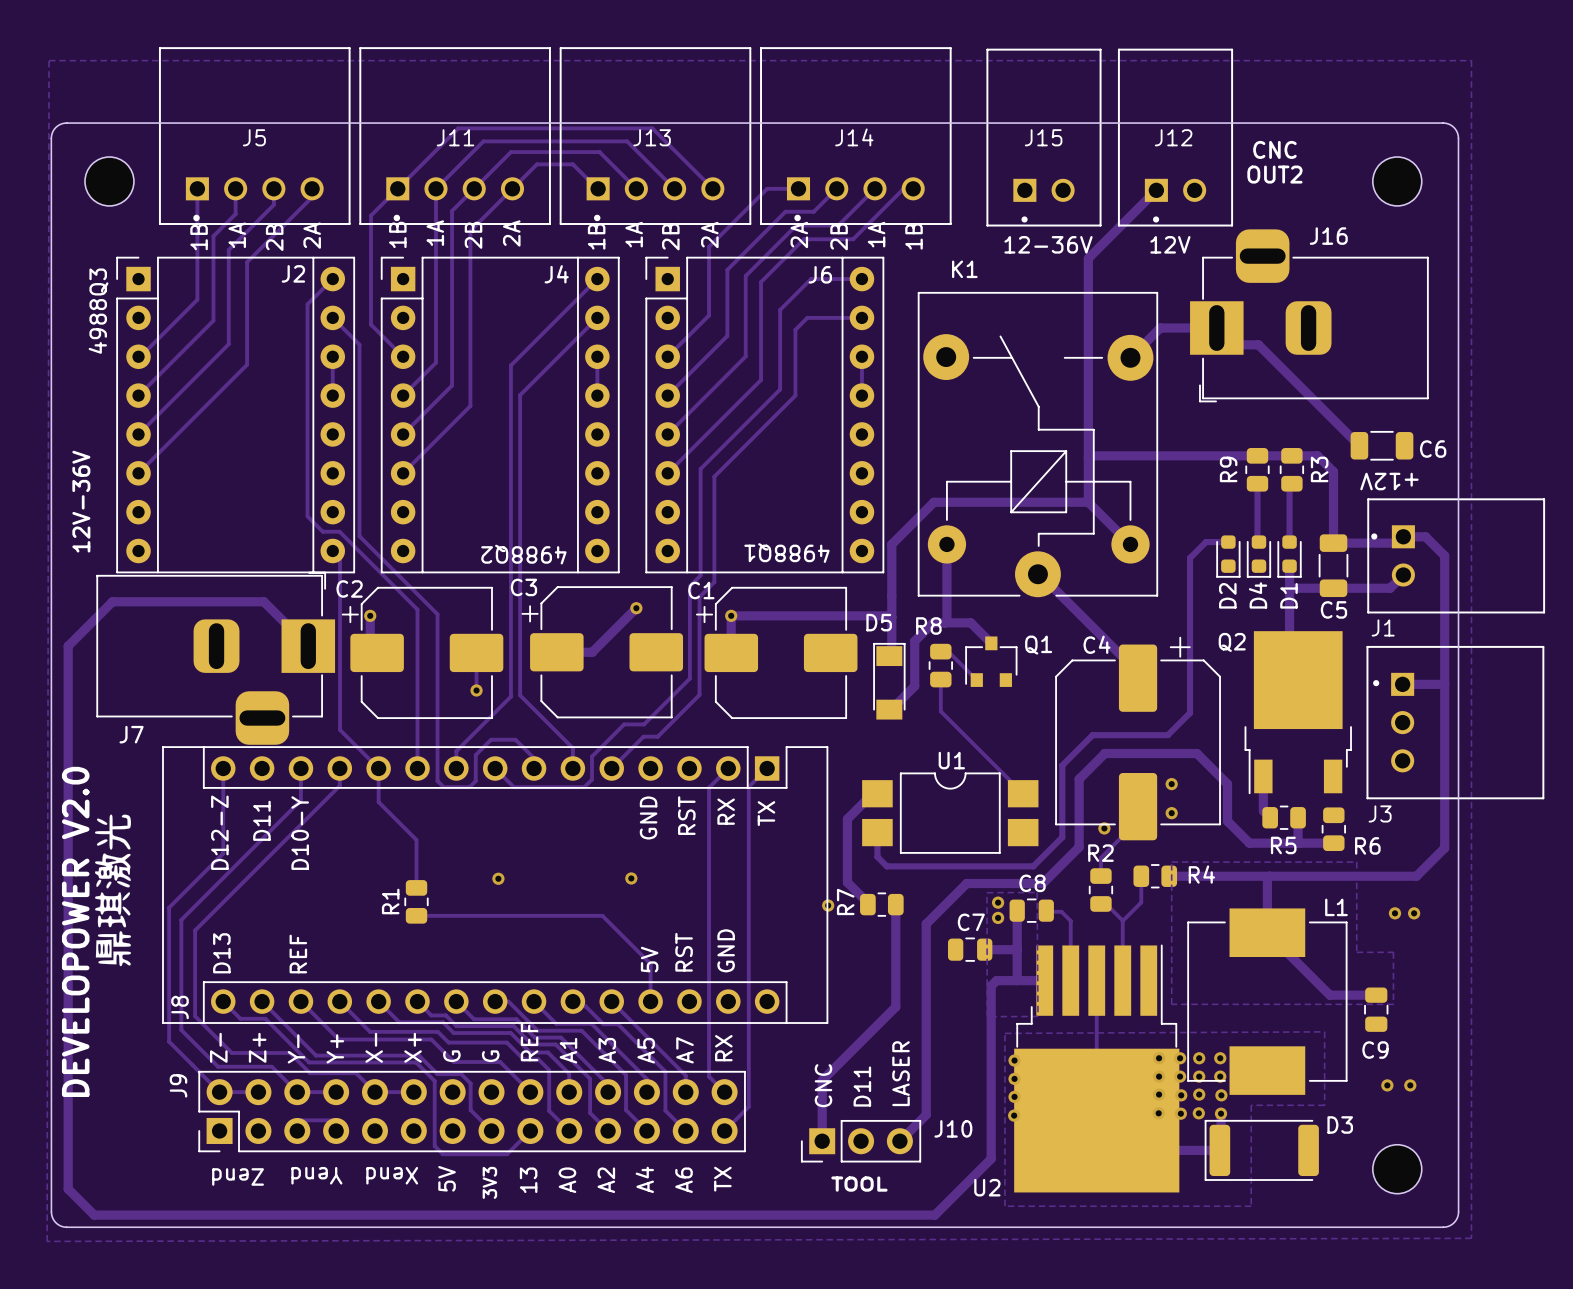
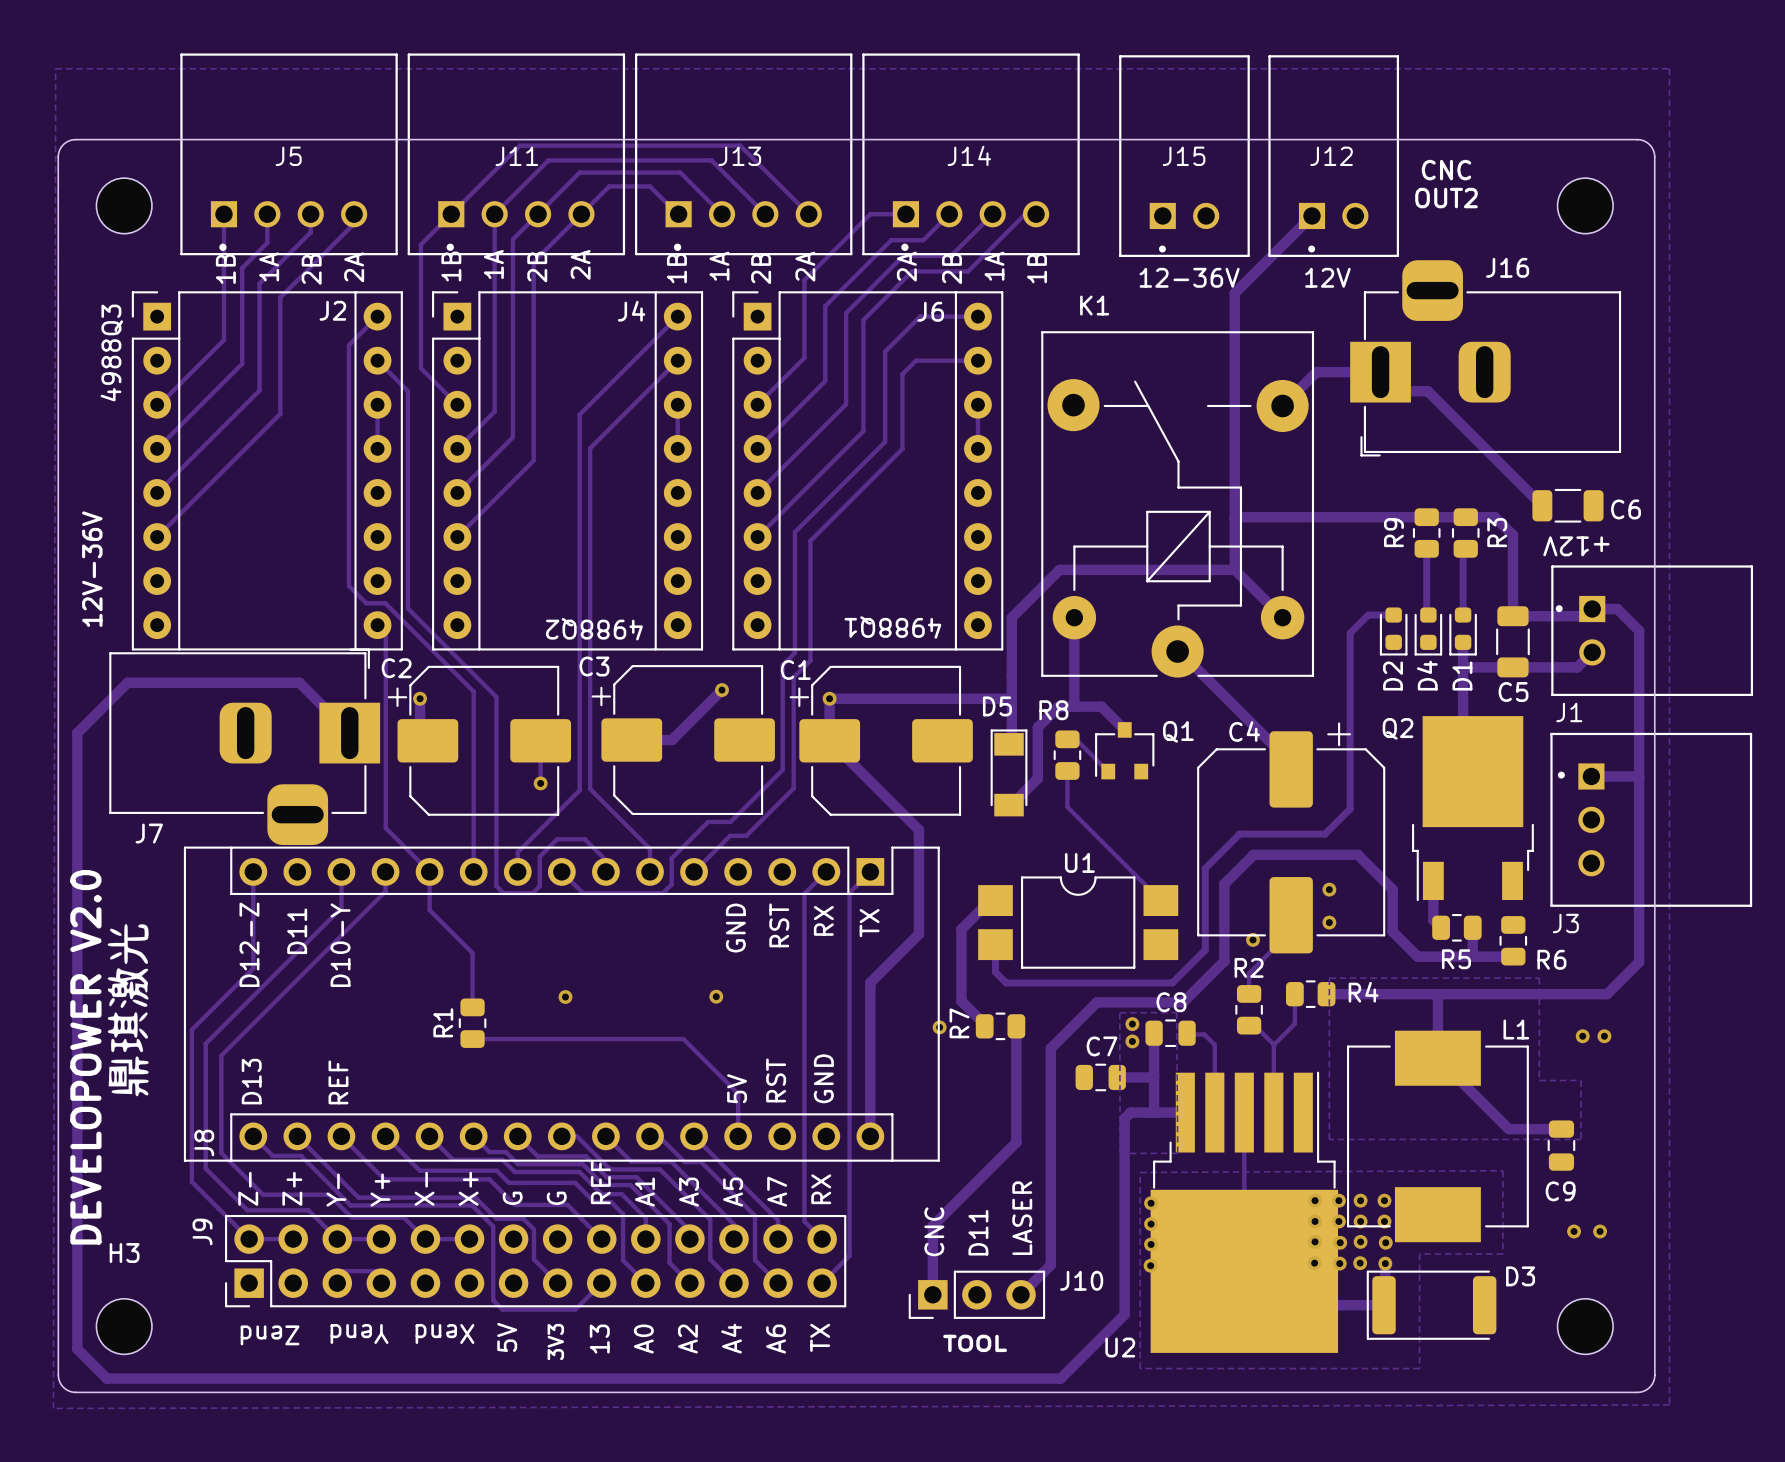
track: none -> (829, 740) (918, 830) (918, 934) (870, 982) (870, 1136)
H3: none -> (124, 1326)

